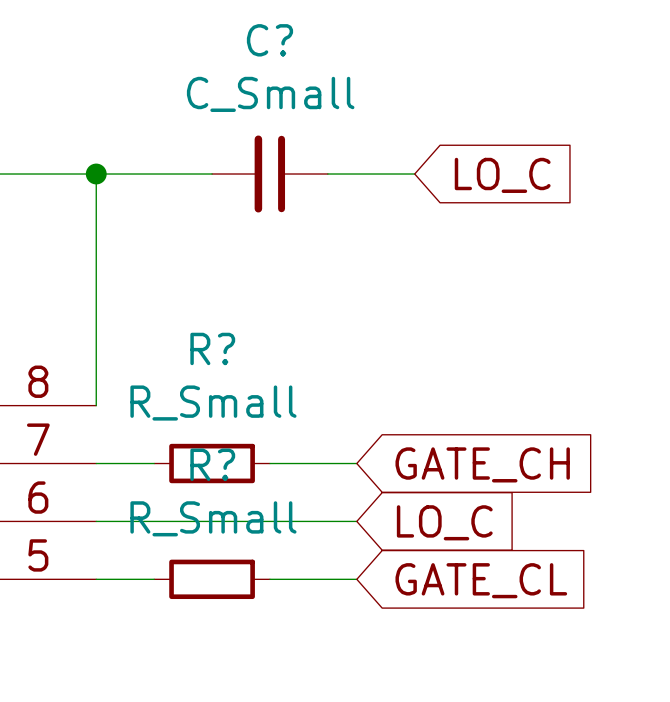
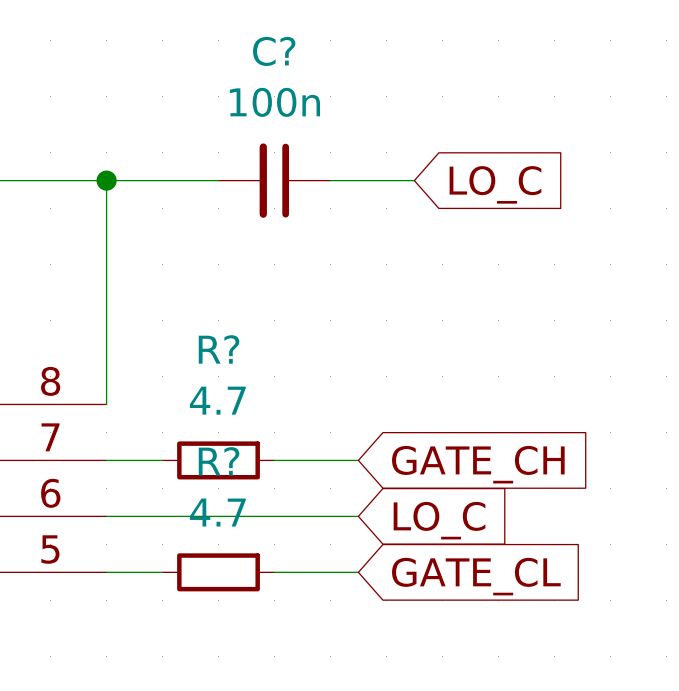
C? value: C_Small (270, 94) -> 100n (274, 102)
R? value: R_Small (213, 403) -> 4.7 (217, 400)
R? value: R_Small (213, 518) -> 4.7 (217, 512)

